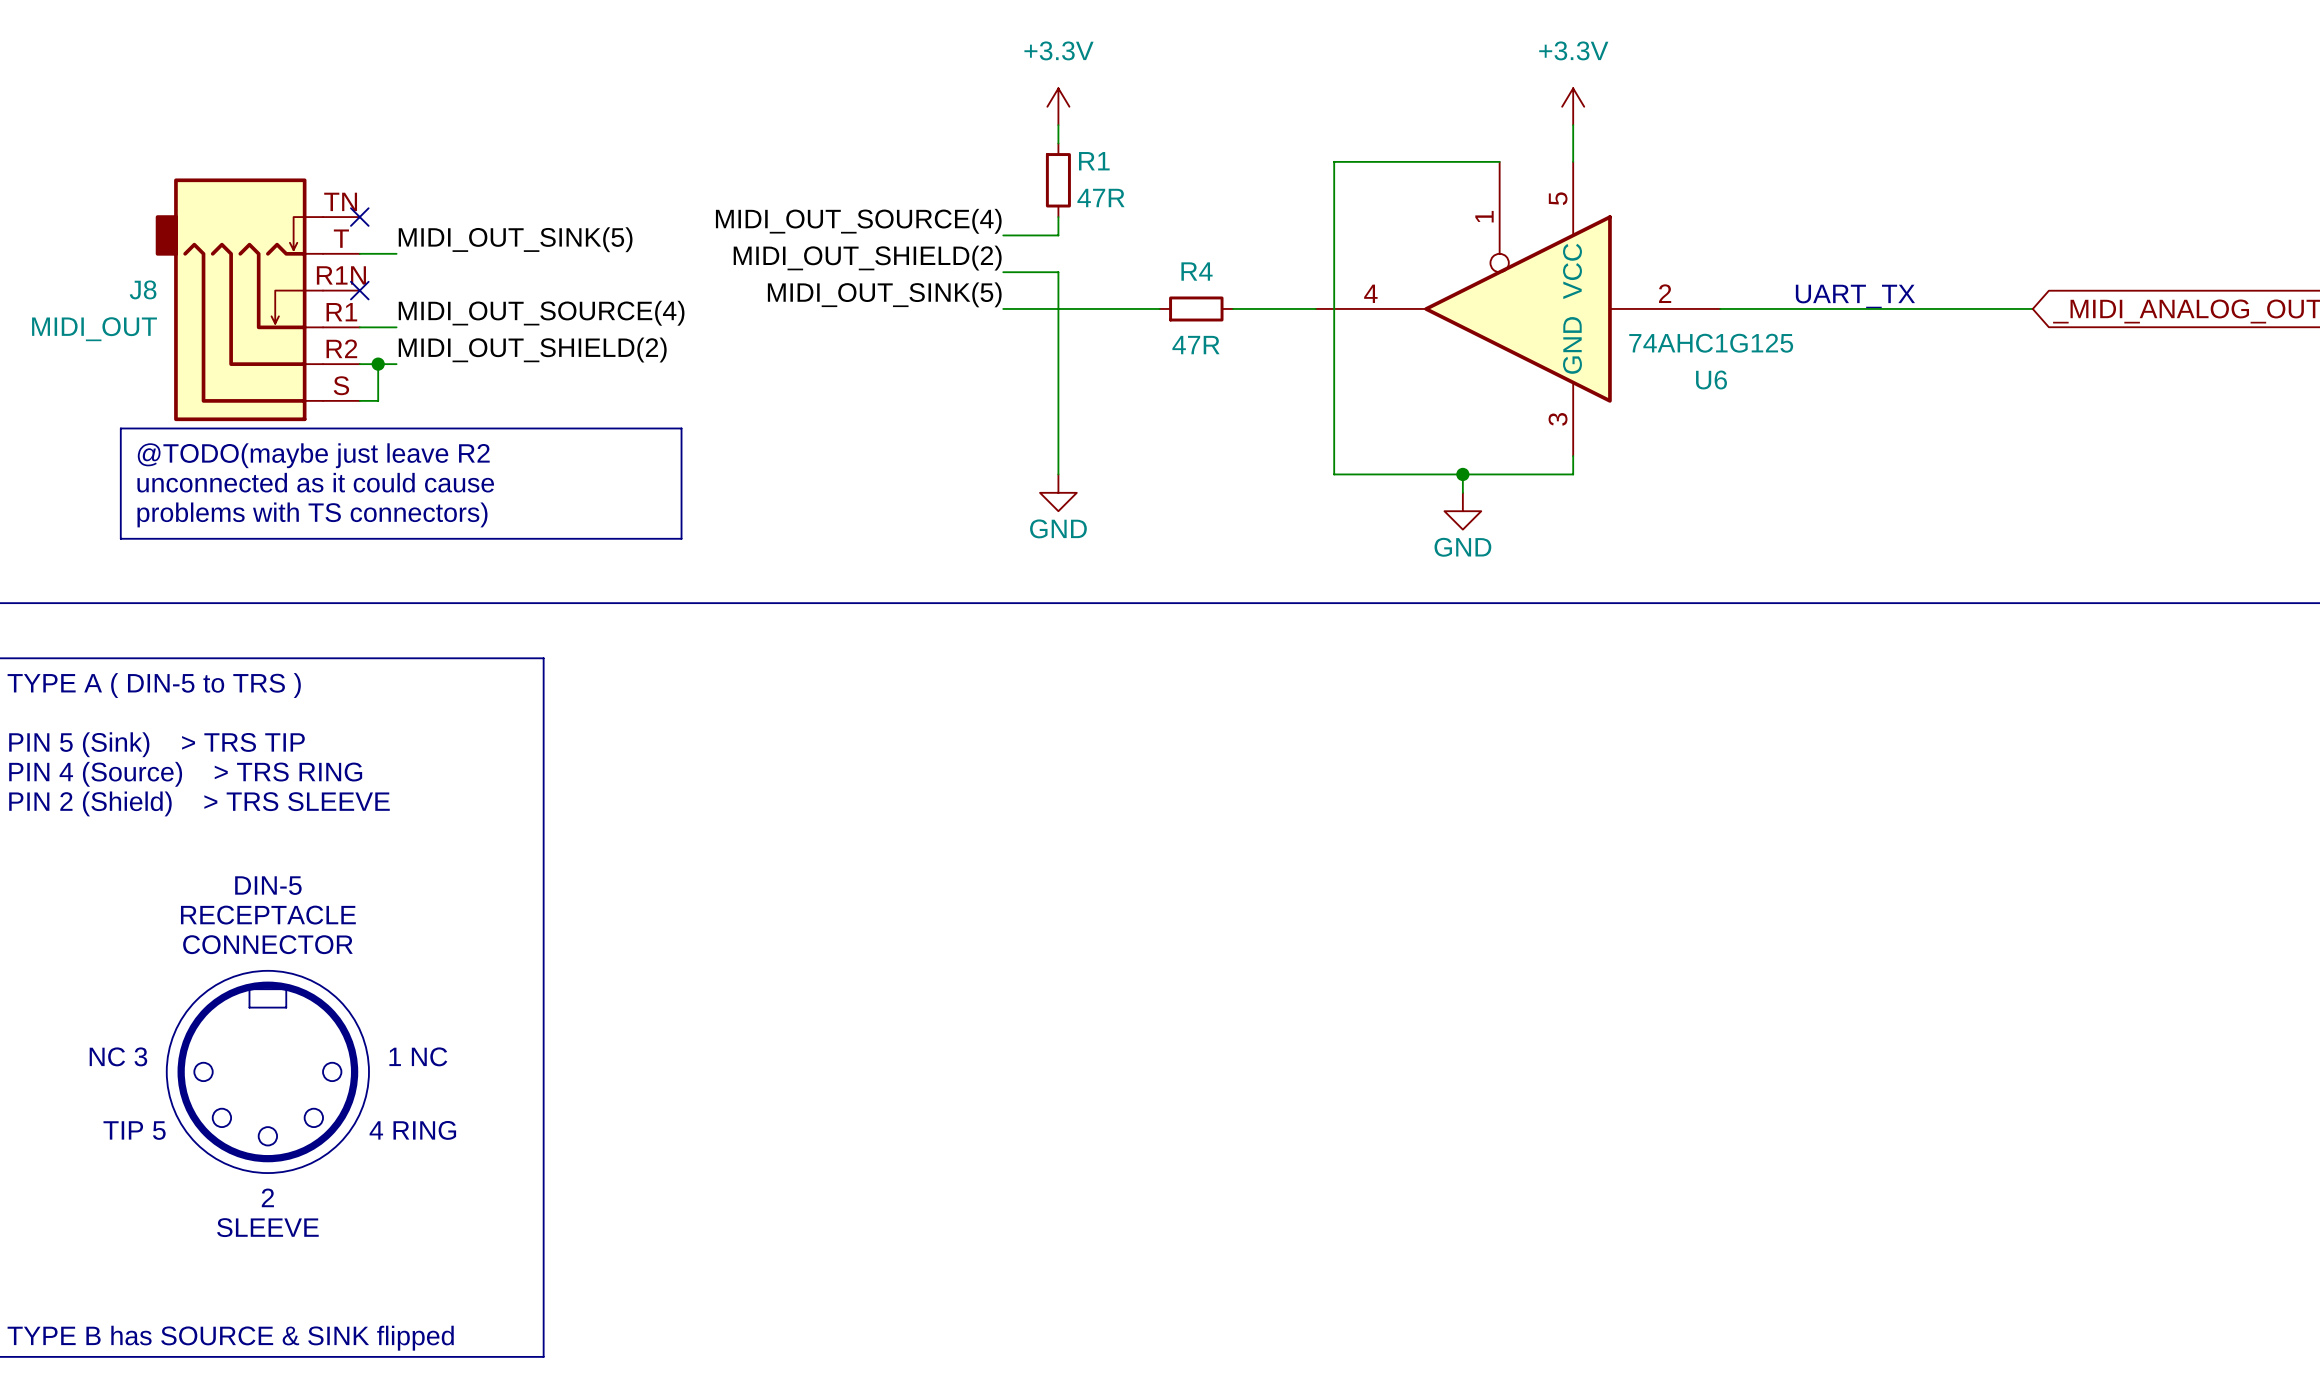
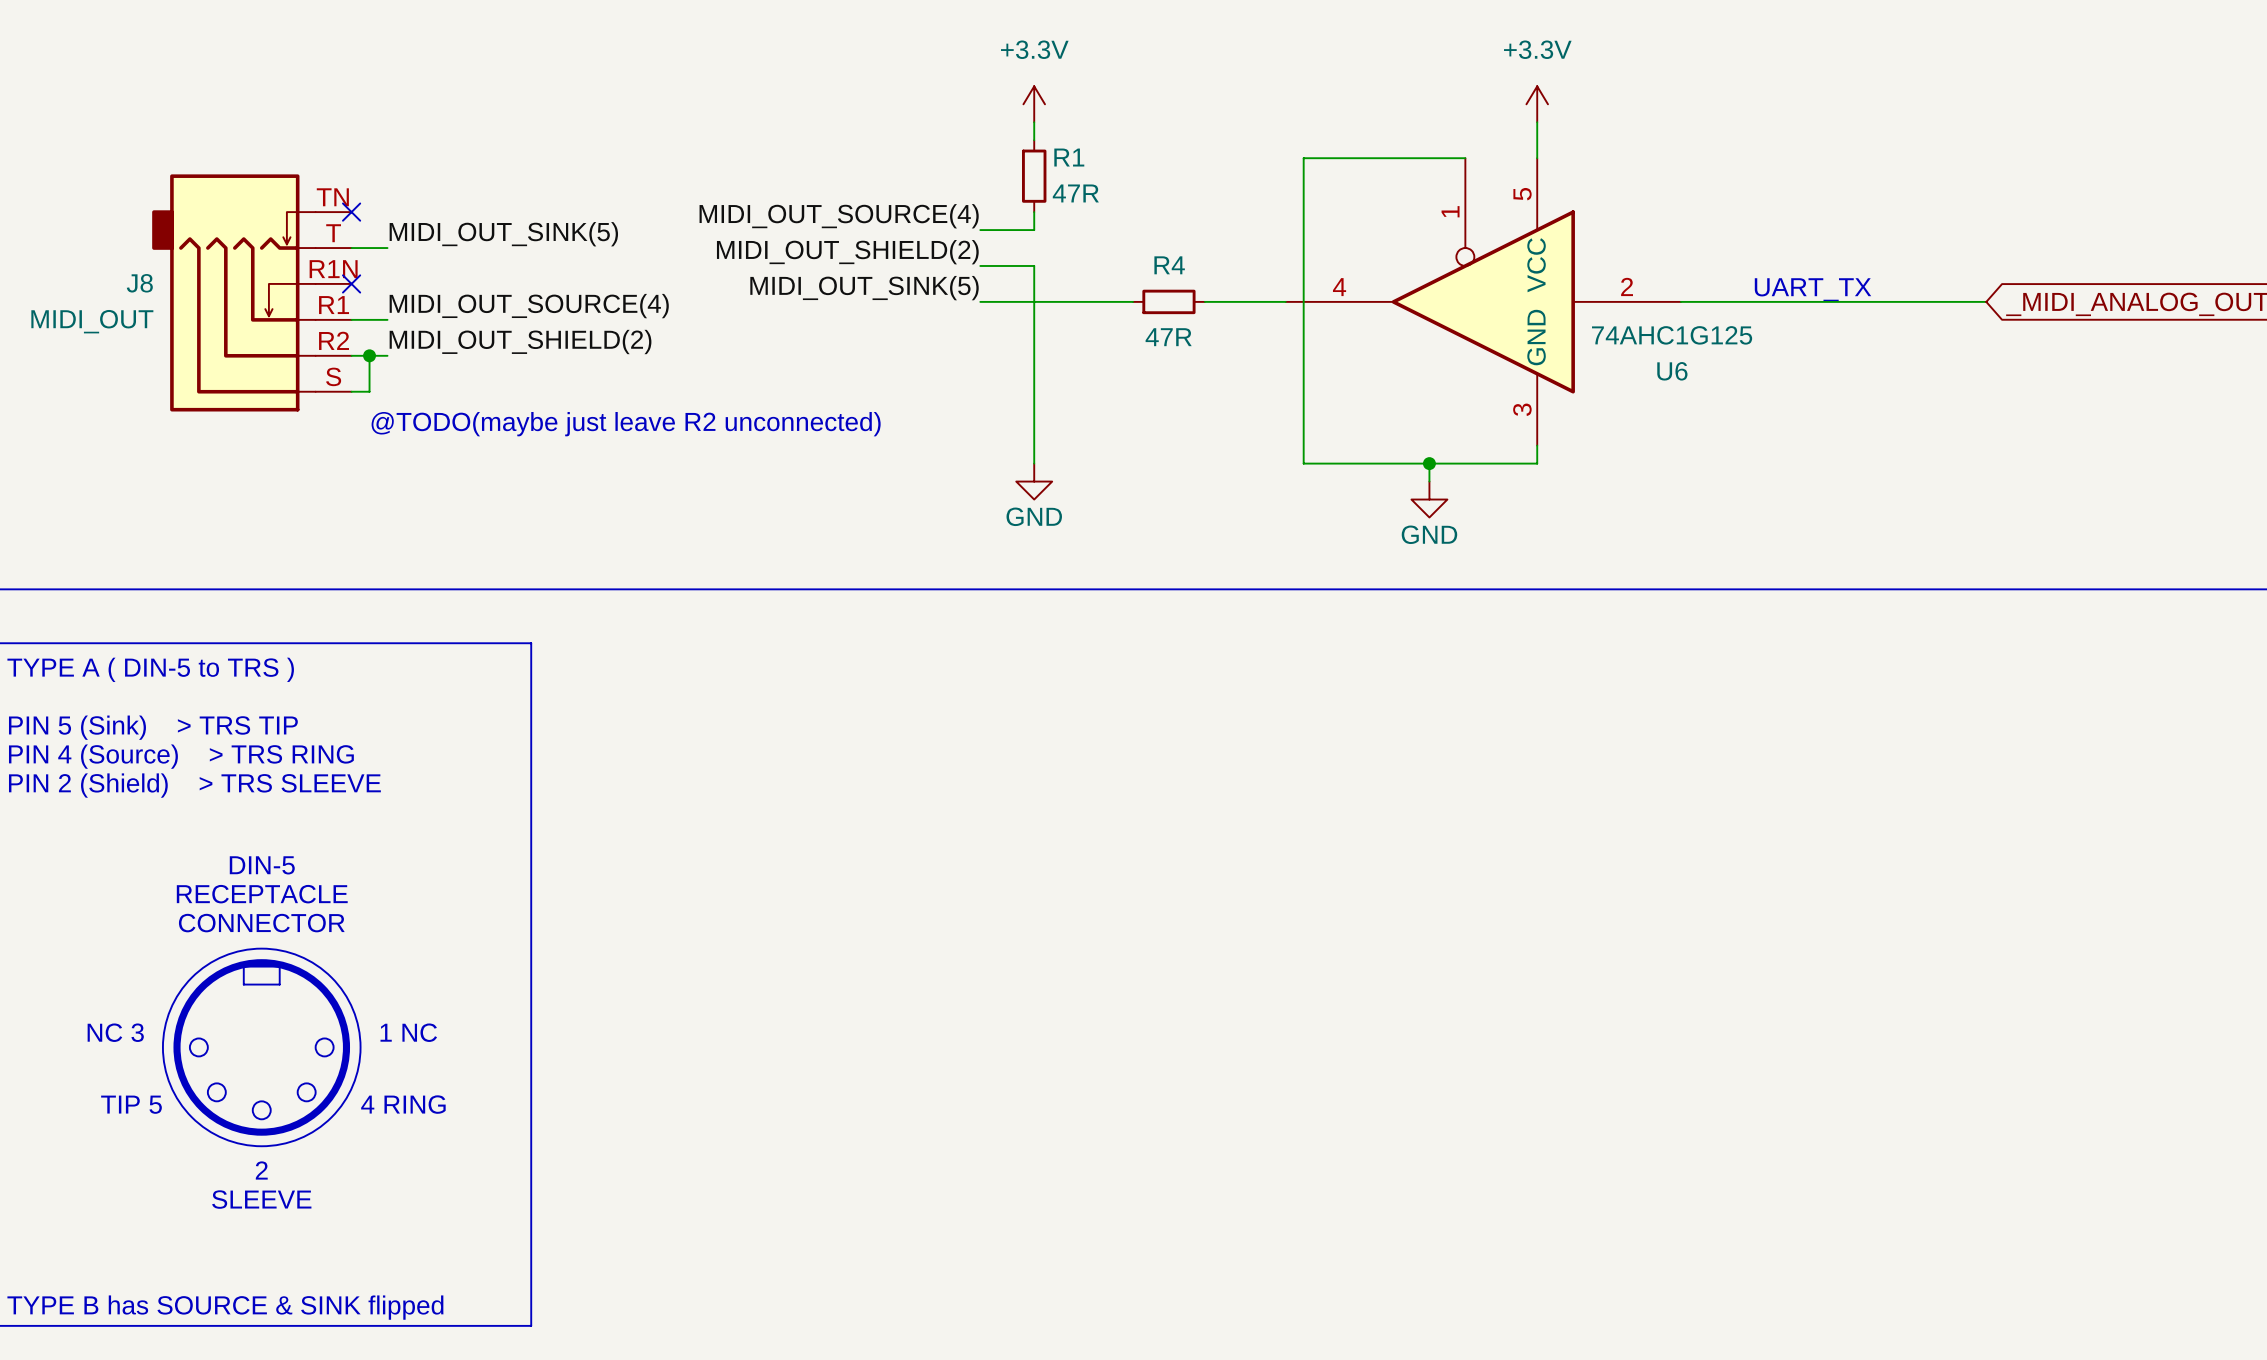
line: (120, 428) (681, 428) (681, 538) (120, 538) (120, 428) -> none
text: @TODO(maybe just leave R2 (313, 455) -> @TODO(maybe just leave R2 unconnected) (626, 424)
text: unconnected as it could cause (315, 482) -> none
text: problems with TS connectors) (312, 514) -> none

